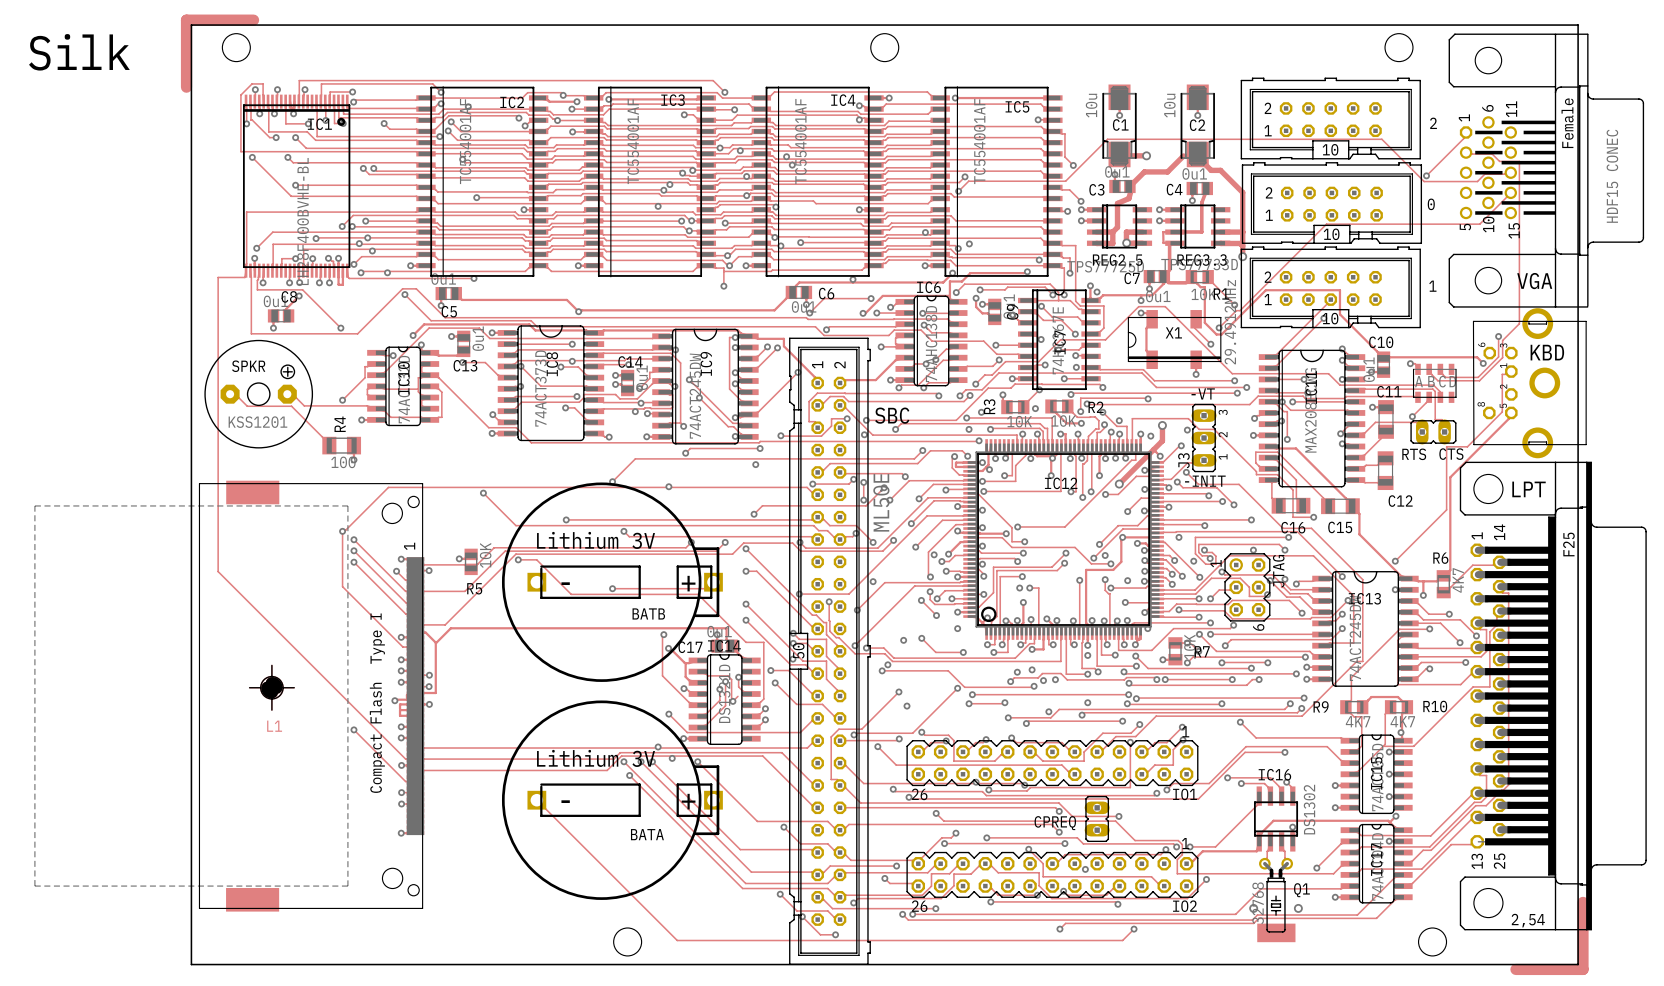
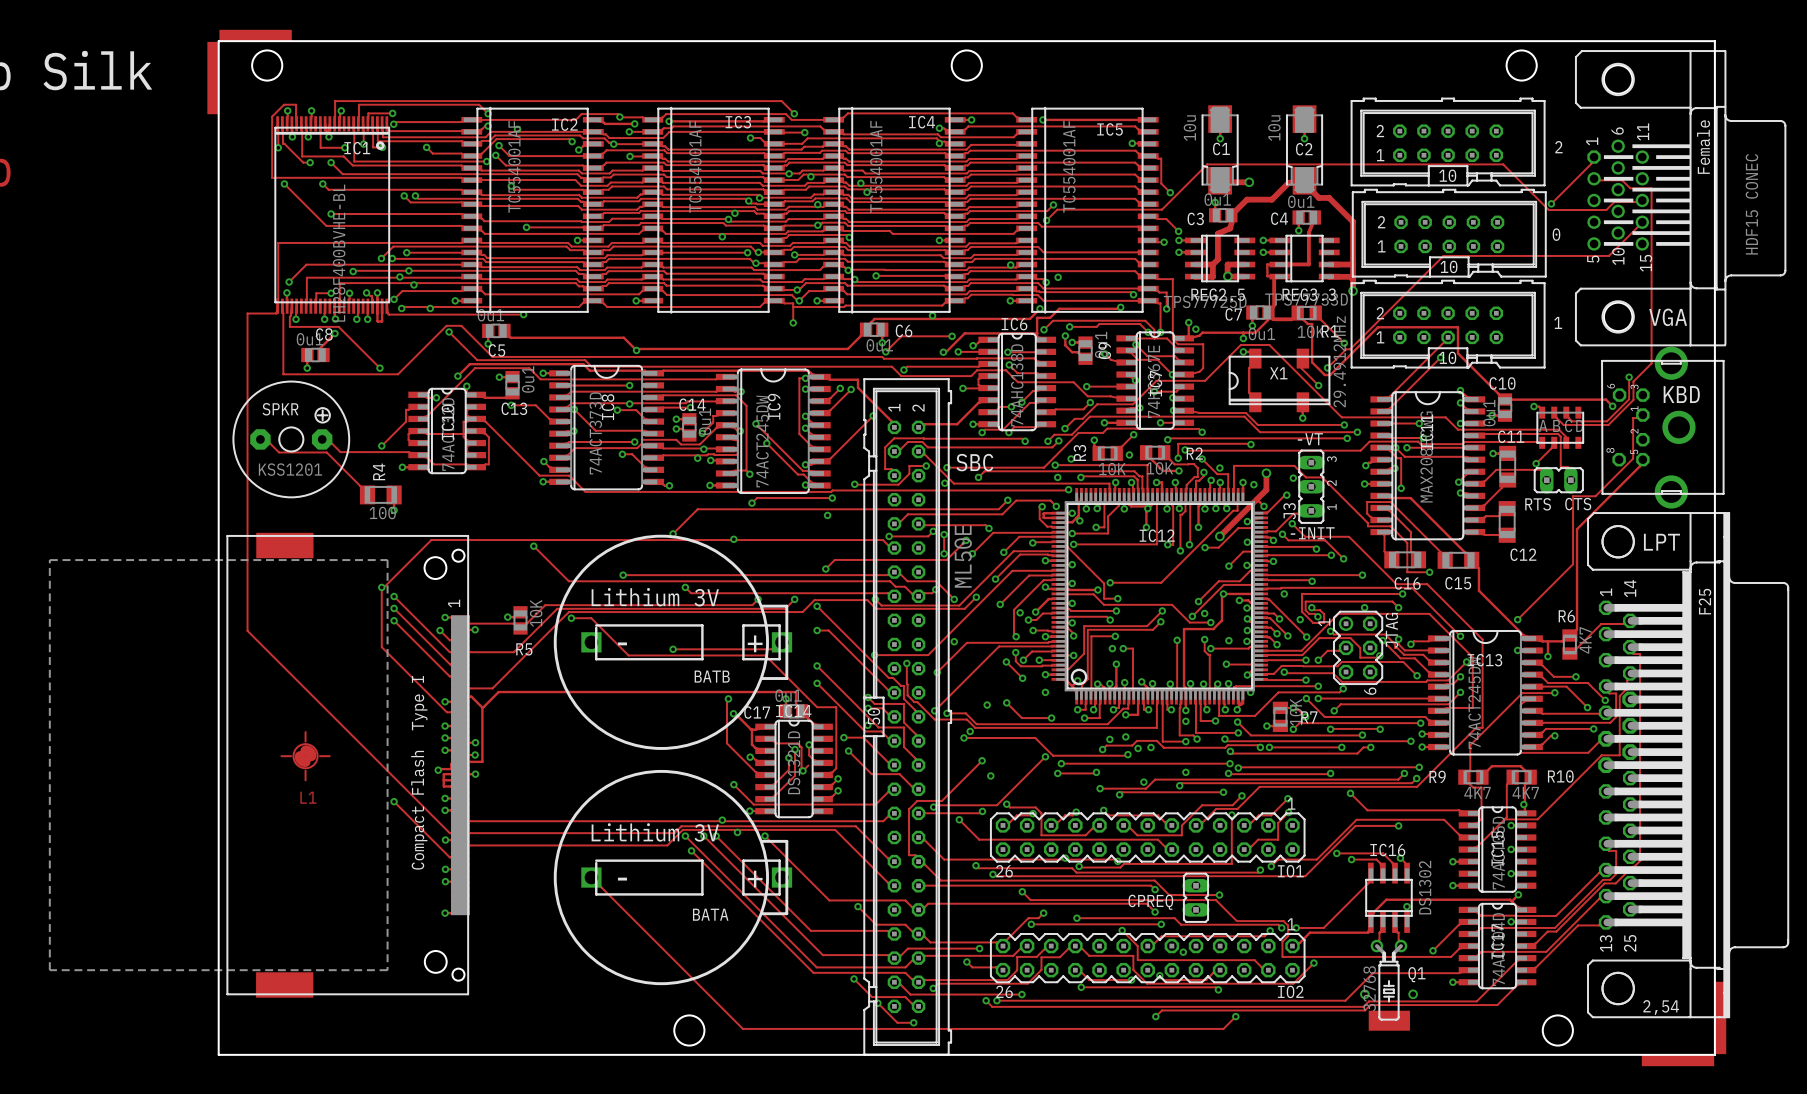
drawing shape: [180, 14, 260, 93] -> [207, 29, 292, 115]
VGA footprint: [1448, 33, 1645, 308] -> [1575, 50, 1787, 347]
IC7 footprint: [1018, 289, 1101, 391] -> [1116, 331, 1195, 430]
IC8 footprint: [497, 325, 605, 442] -> [549, 365, 665, 491]
IC9 footprint: [652, 328, 759, 445] -> [715, 368, 831, 494]
LPT footprint: [1459, 461, 1647, 931] -> [1587, 512, 1789, 1018]
IC13 footprint: [1312, 571, 1419, 687] -> [1428, 630, 1543, 756]
drawing shape: [248, 664, 295, 711] -> [280, 731, 331, 782]
drawing shape: [1510, 896, 1589, 976] -> [1641, 981, 1727, 1067]

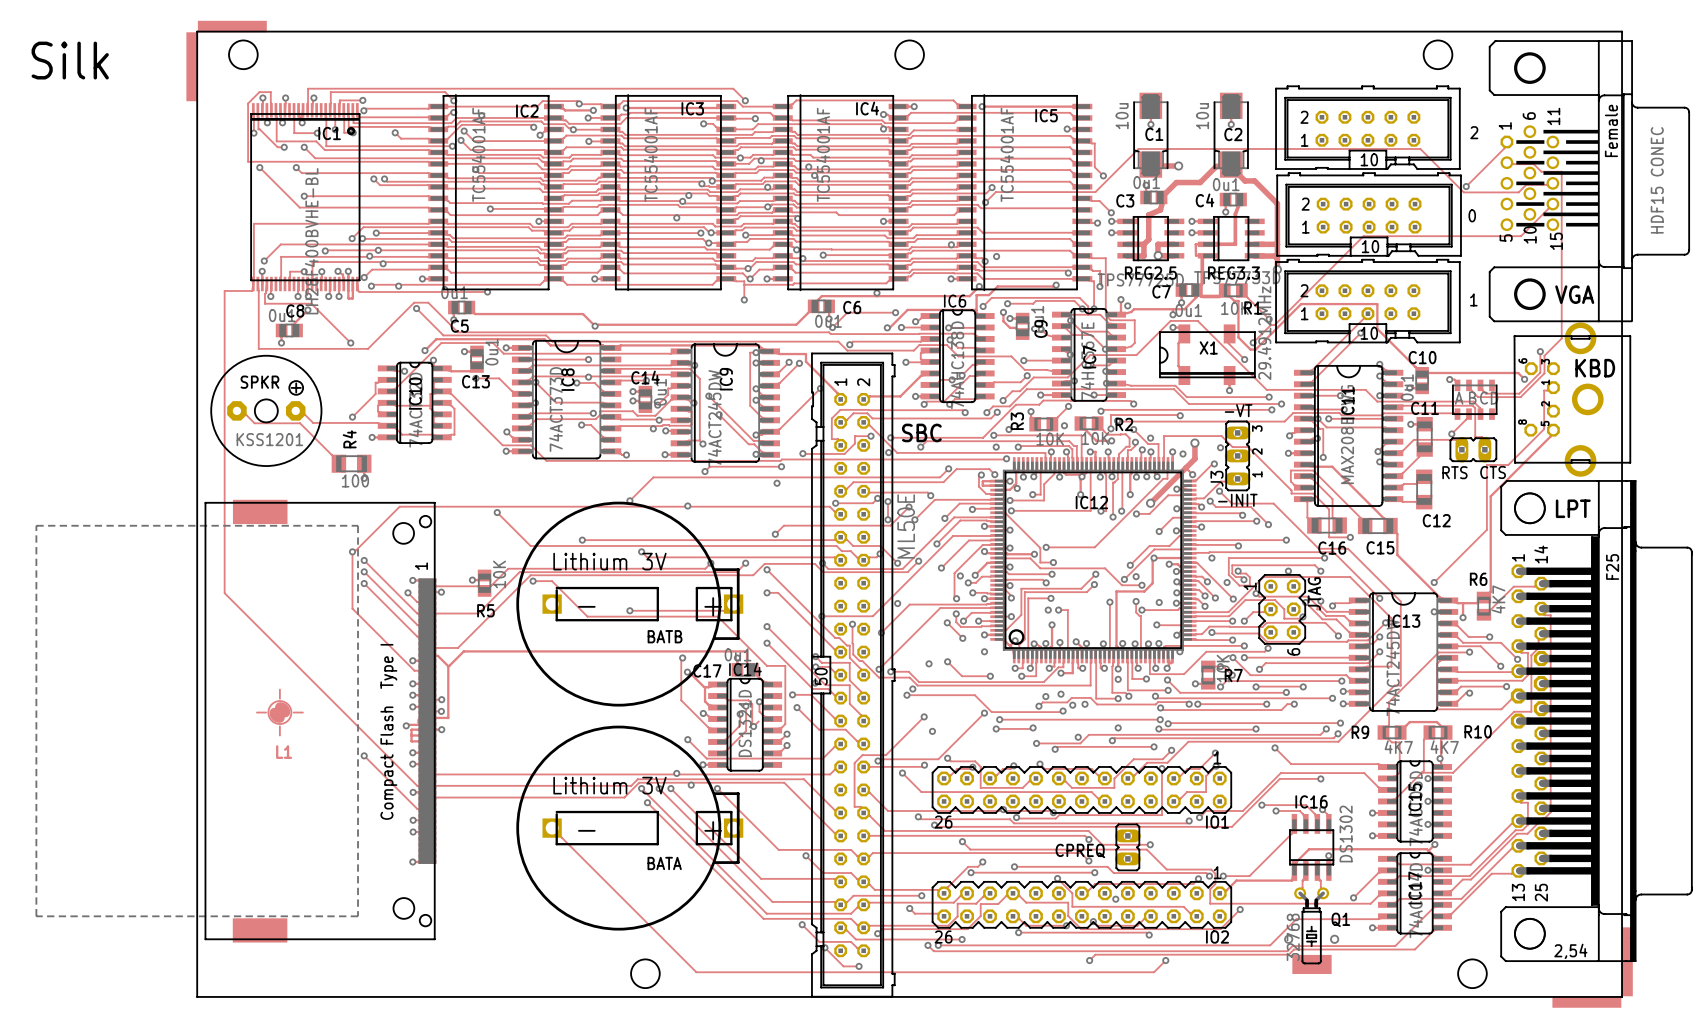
IC7 footprint: [1116, 331, 1195, 430] -> [1052, 308, 1127, 402]

